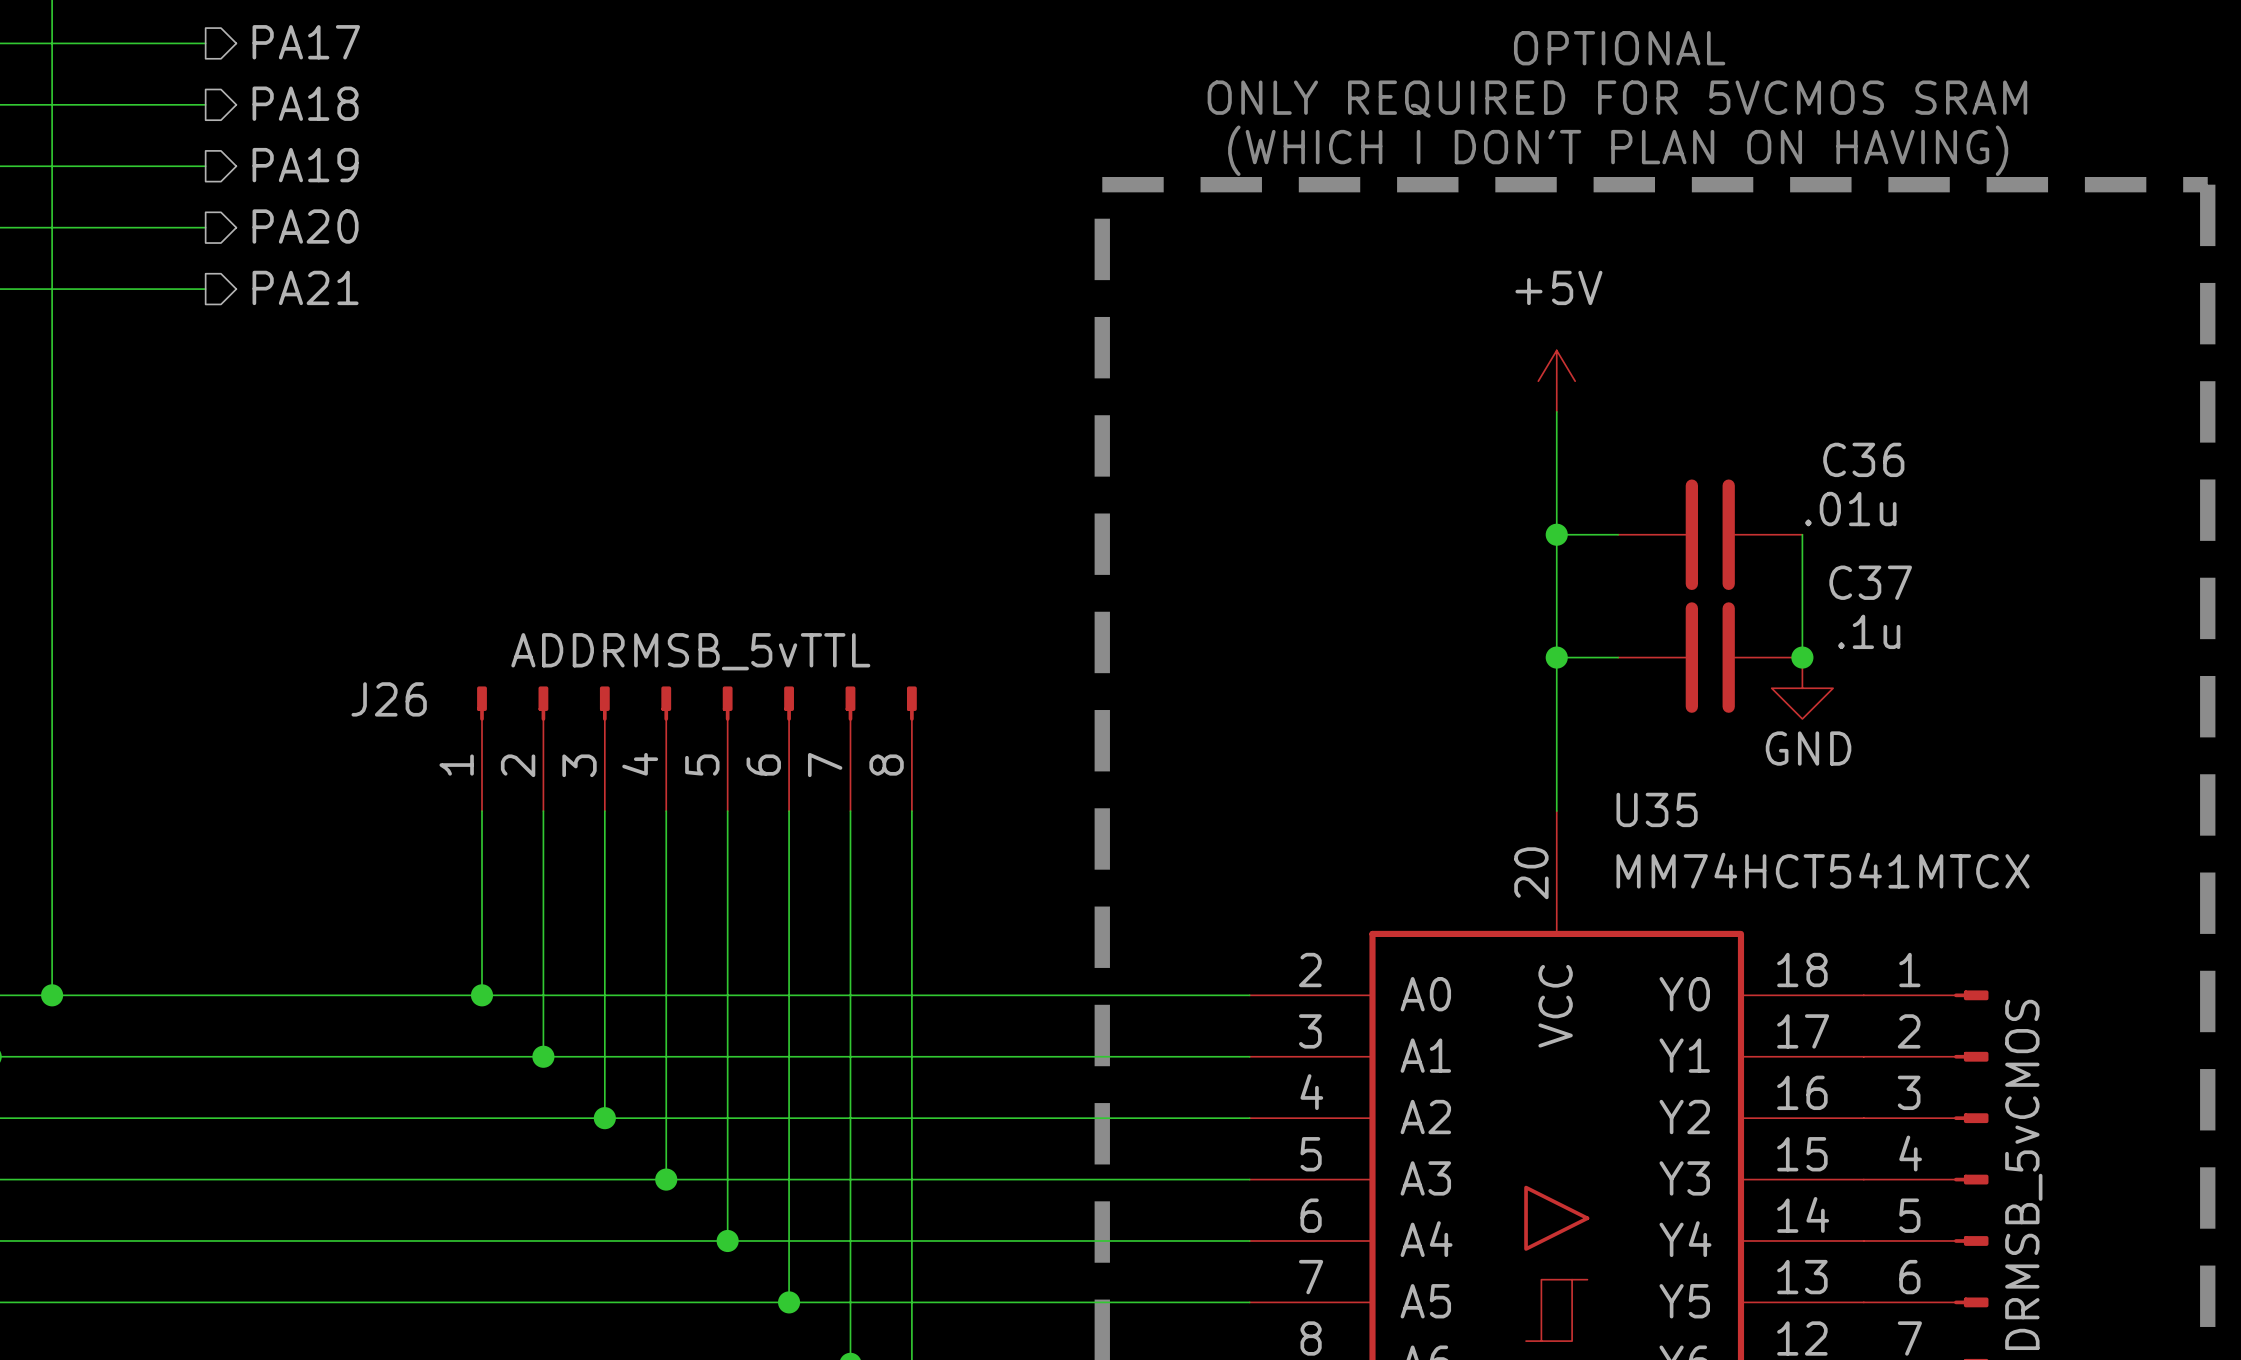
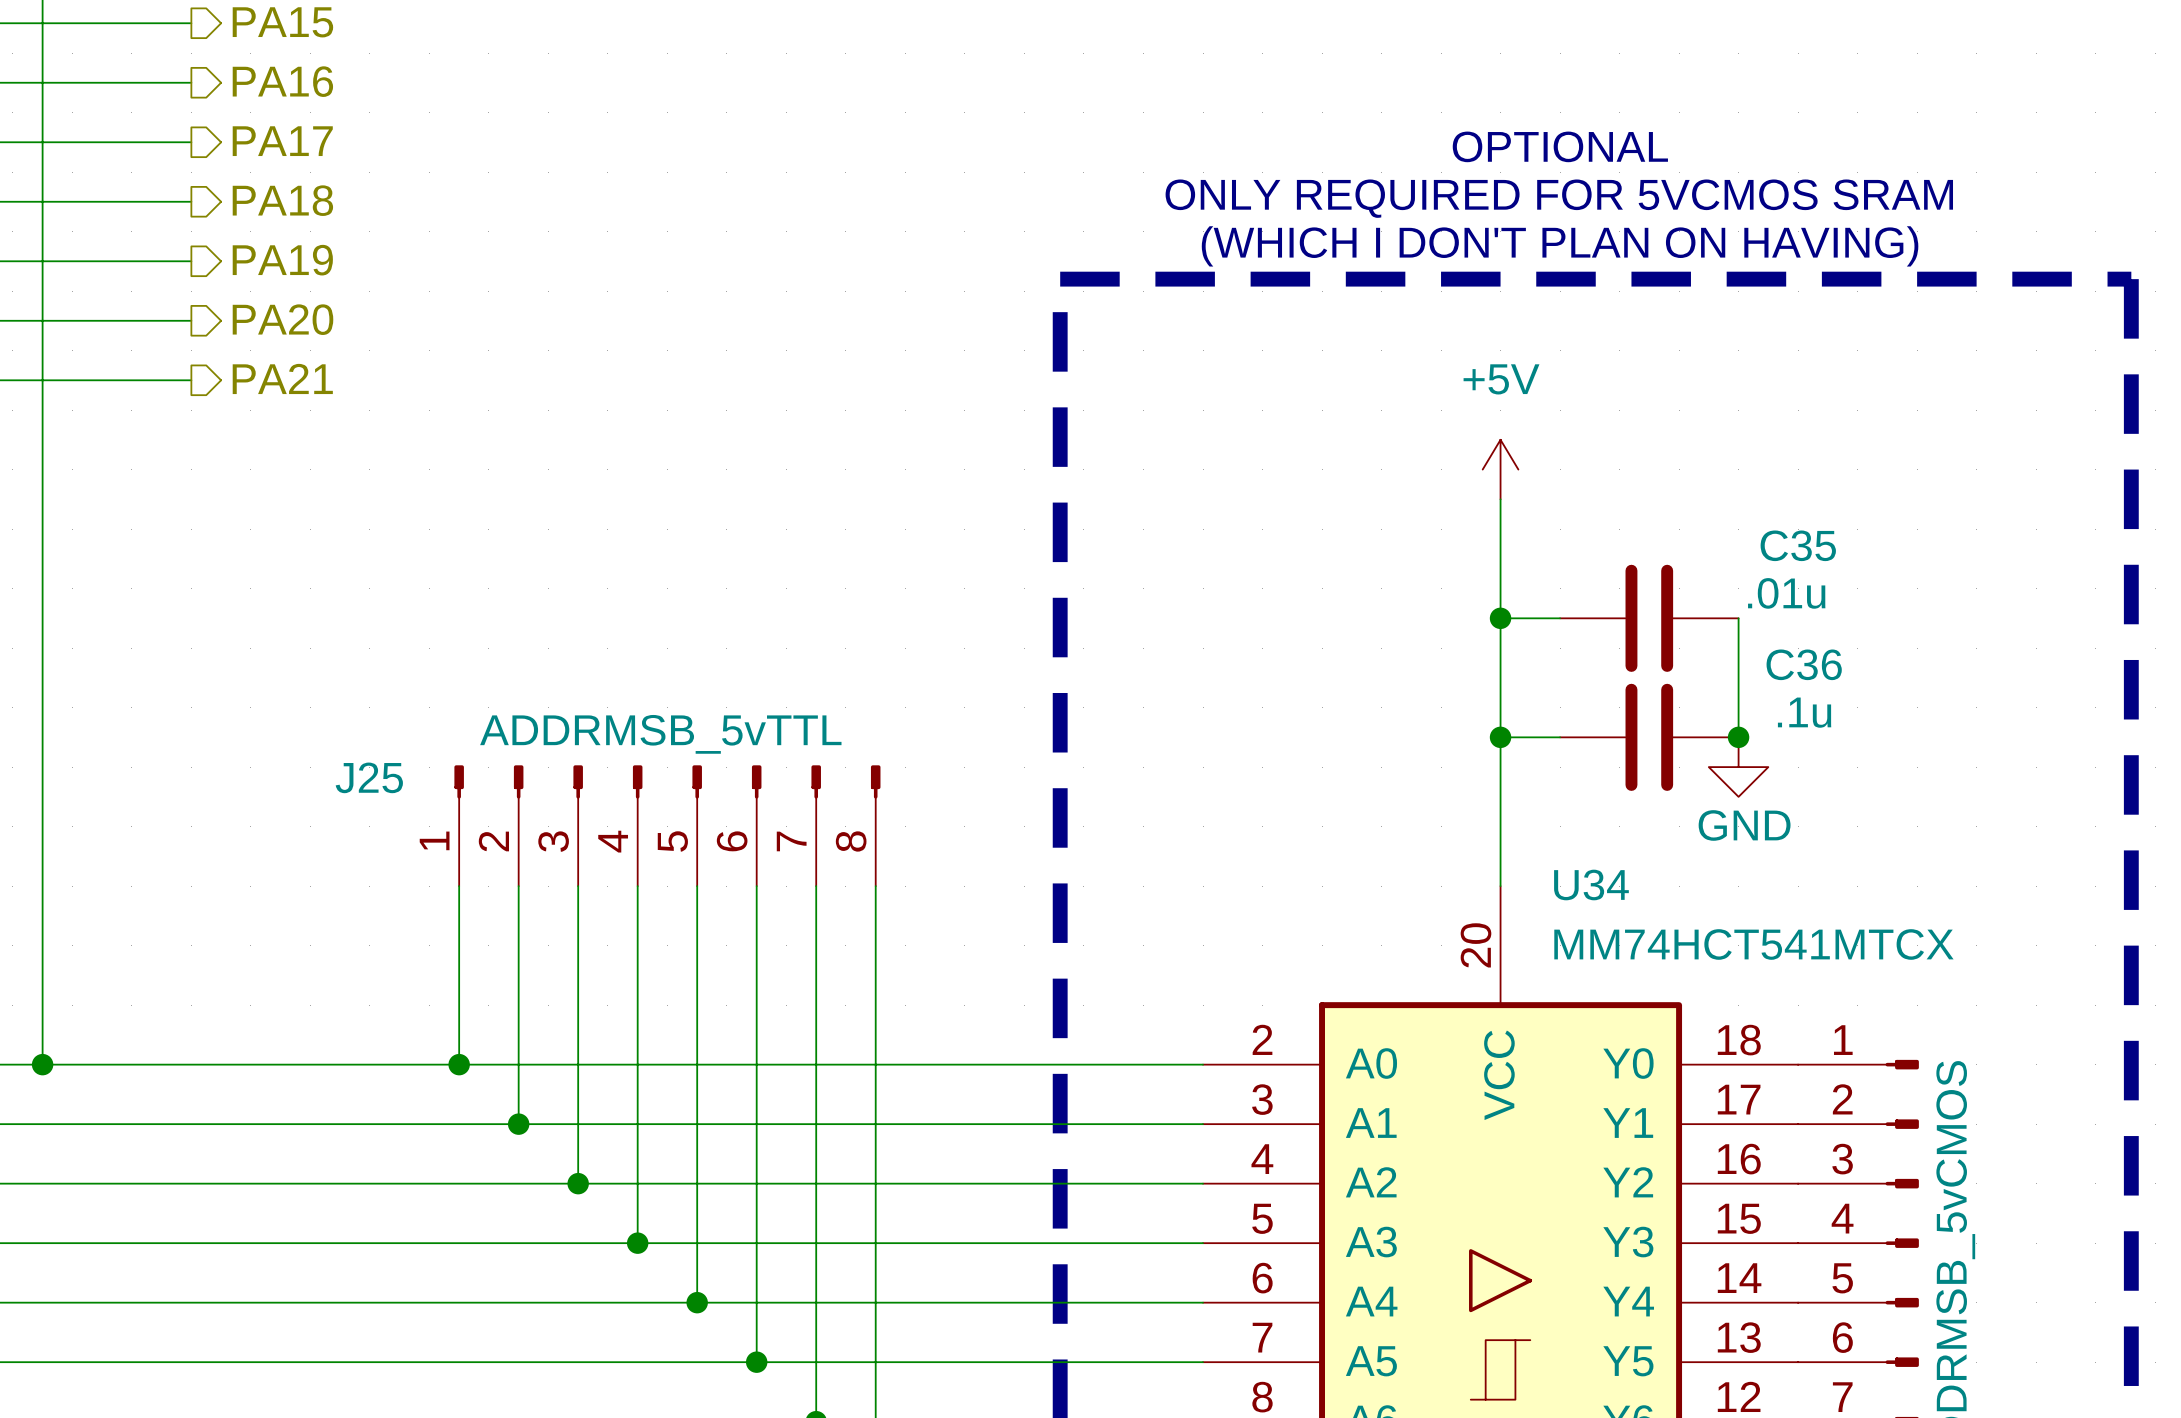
C36 name: C36 (1863, 459) -> C35 (1798, 545)
C37 name: C37 (1870, 582) -> C36 (1804, 664)
J26 name: J26 (389, 699) -> J25 (369, 777)
U35 name: U35 (1657, 809) -> U34 (1591, 884)

